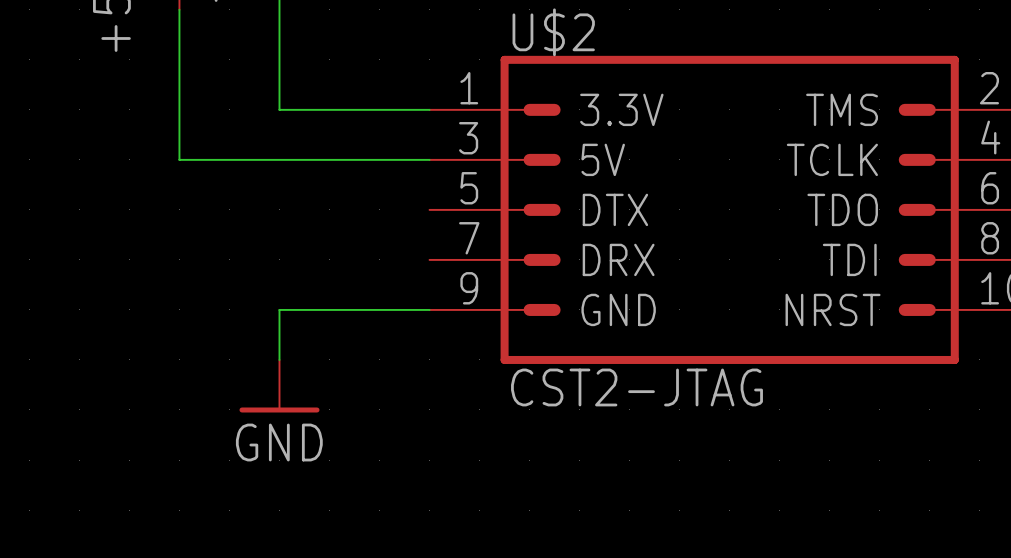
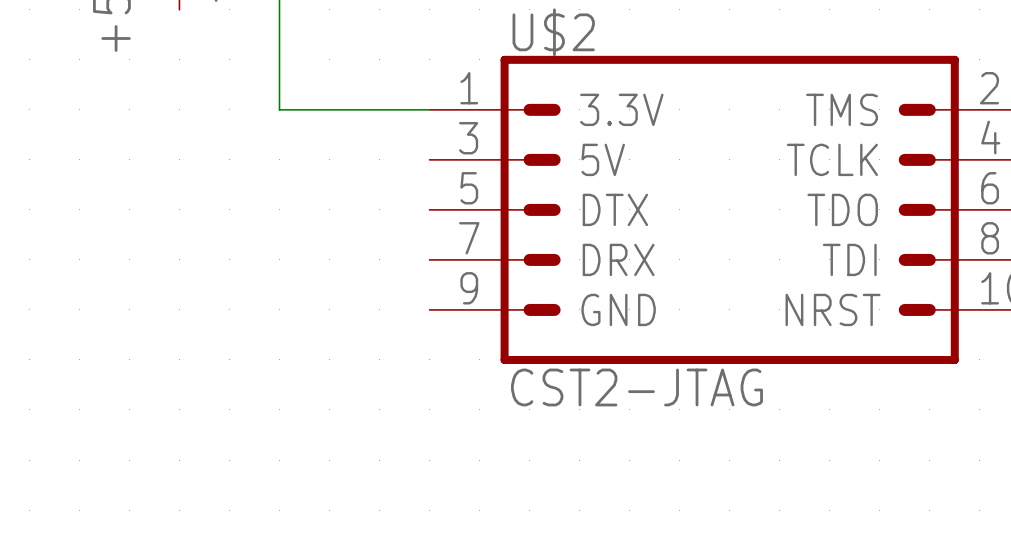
wire: (179, 9) (179, 159) (429, 159) -> none
wire: (429, 309) (279, 309) (279, 359) -> none
power symbol: GND (279, 386) -> none

